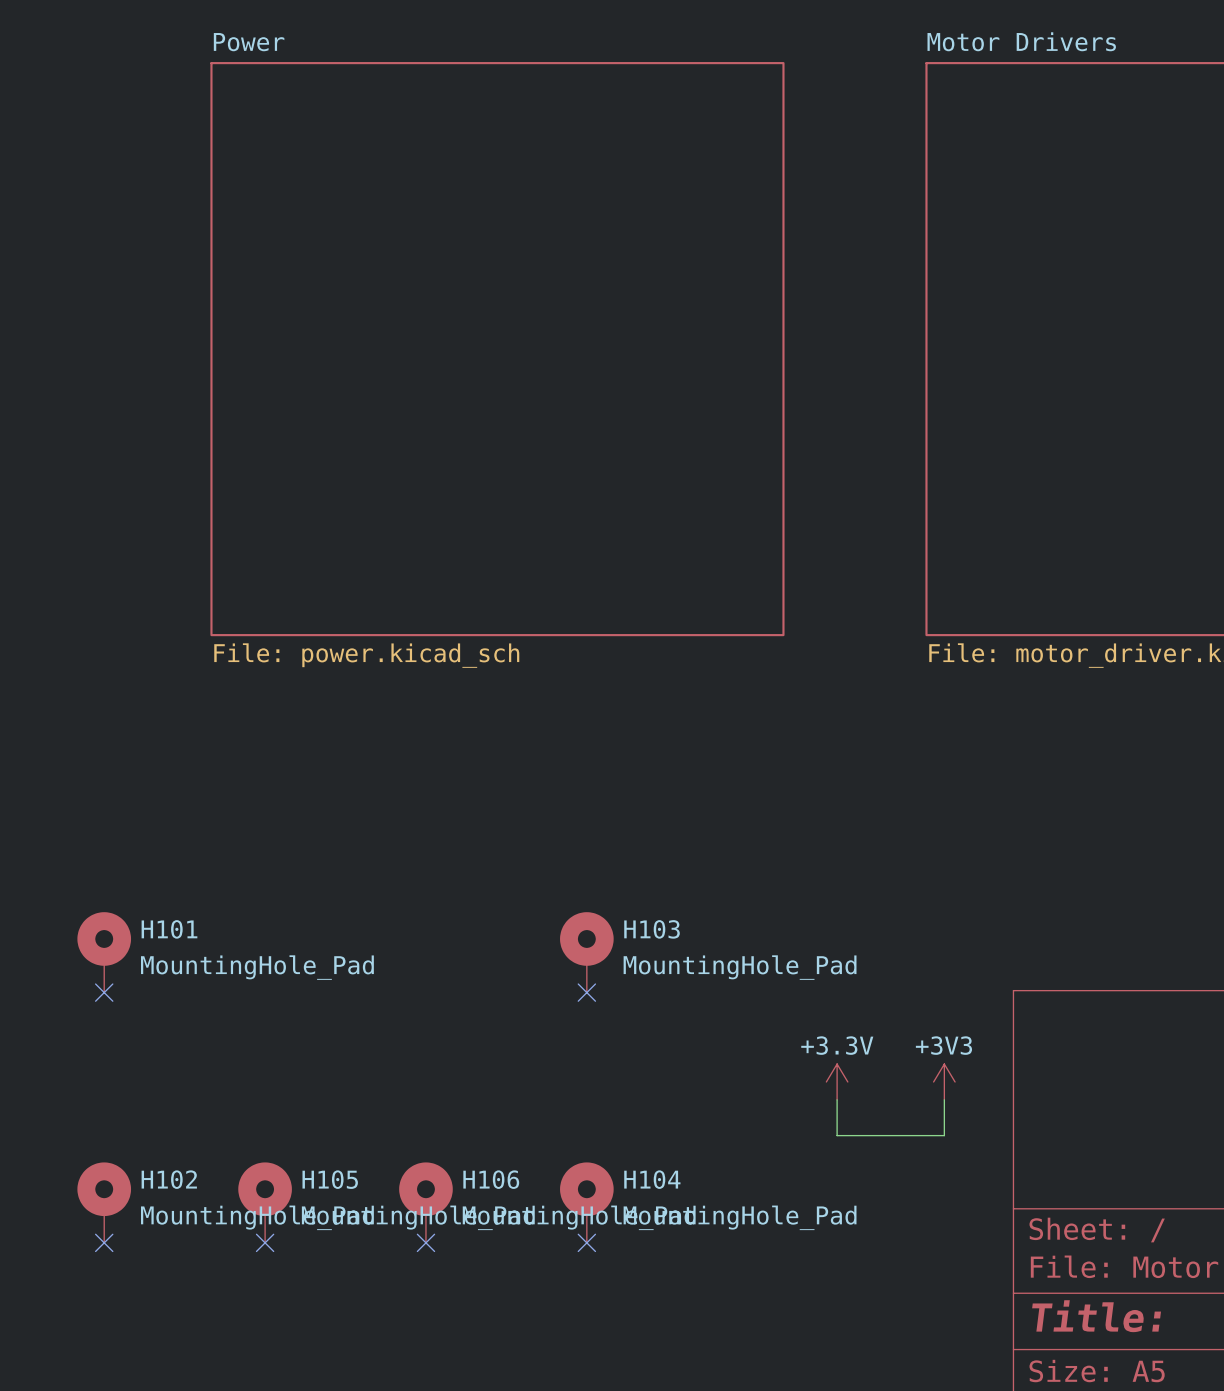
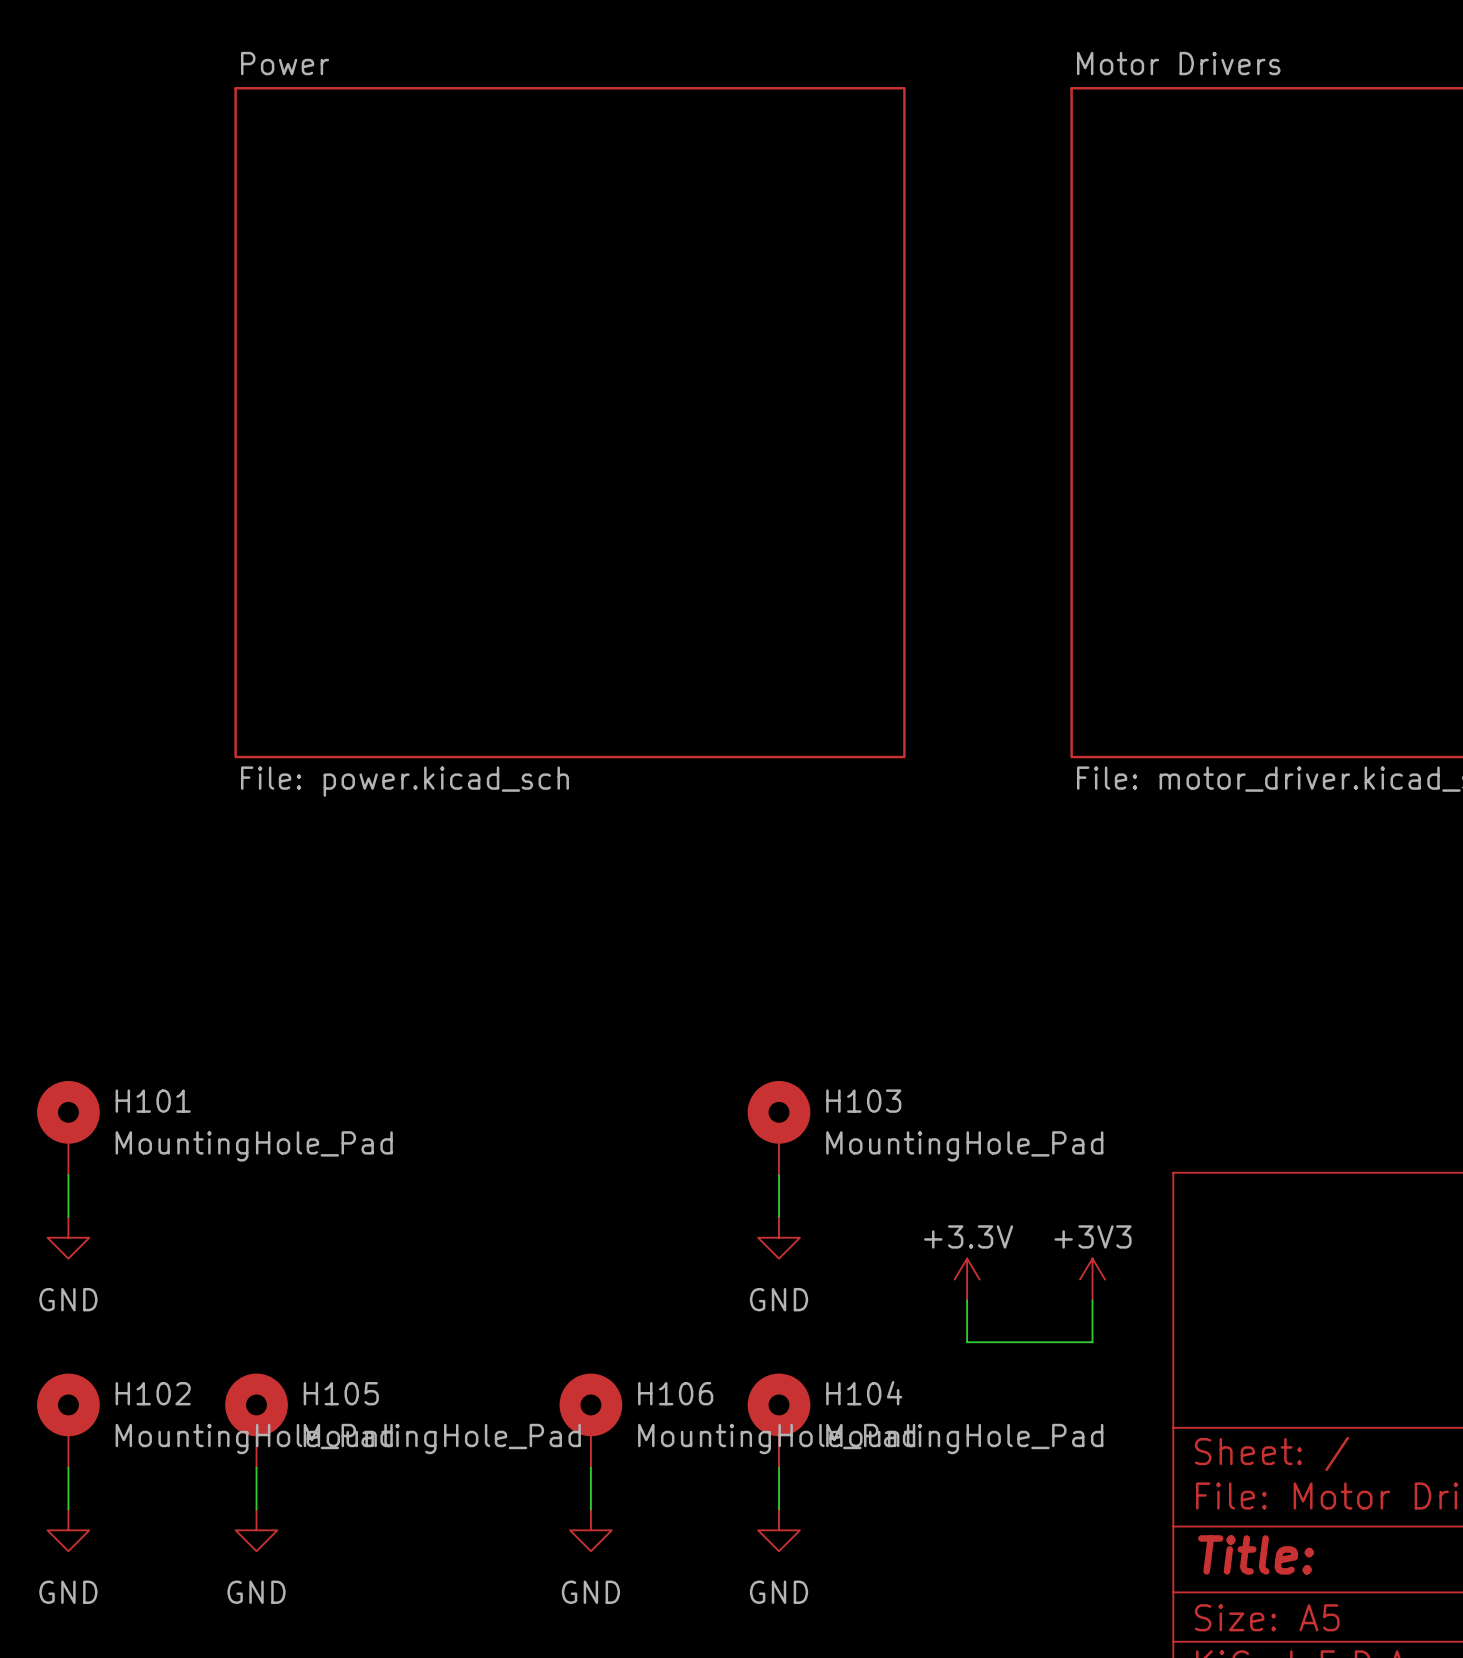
H101 position: (104, 952) -> (68, 1128)
H103 position: (586, 952) -> (779, 1128)
wire: none -> (68, 1175) (68, 1216)
no-connect mark: (104, 992) -> none
no-connect mark: (586, 992) -> none
wire: none -> (779, 1175) (779, 1216)
power symbol: none -> GND (68, 1237)
power symbol: none -> GND (779, 1237)
H102 position: (104, 1202) -> (68, 1420)
H105 position: (265, 1202) -> (256, 1420)
H106 position: (425, 1202) -> (590, 1420)
H104 position: (586, 1202) -> (779, 1420)
wire: none -> (68, 1467) (68, 1509)
no-connect mark: (104, 1242) -> none
wire: none -> (256, 1467) (256, 1509)
no-connect mark: (265, 1242) -> none
no-connect mark: (425, 1242) -> none
wire: none -> (590, 1467) (590, 1509)
no-connect mark: (586, 1242) -> none
wire: none -> (779, 1467) (779, 1509)
power symbol: none -> GND (68, 1530)
power symbol: none -> GND (256, 1530)
power symbol: none -> GND (590, 1530)
power symbol: none -> GND (779, 1530)

